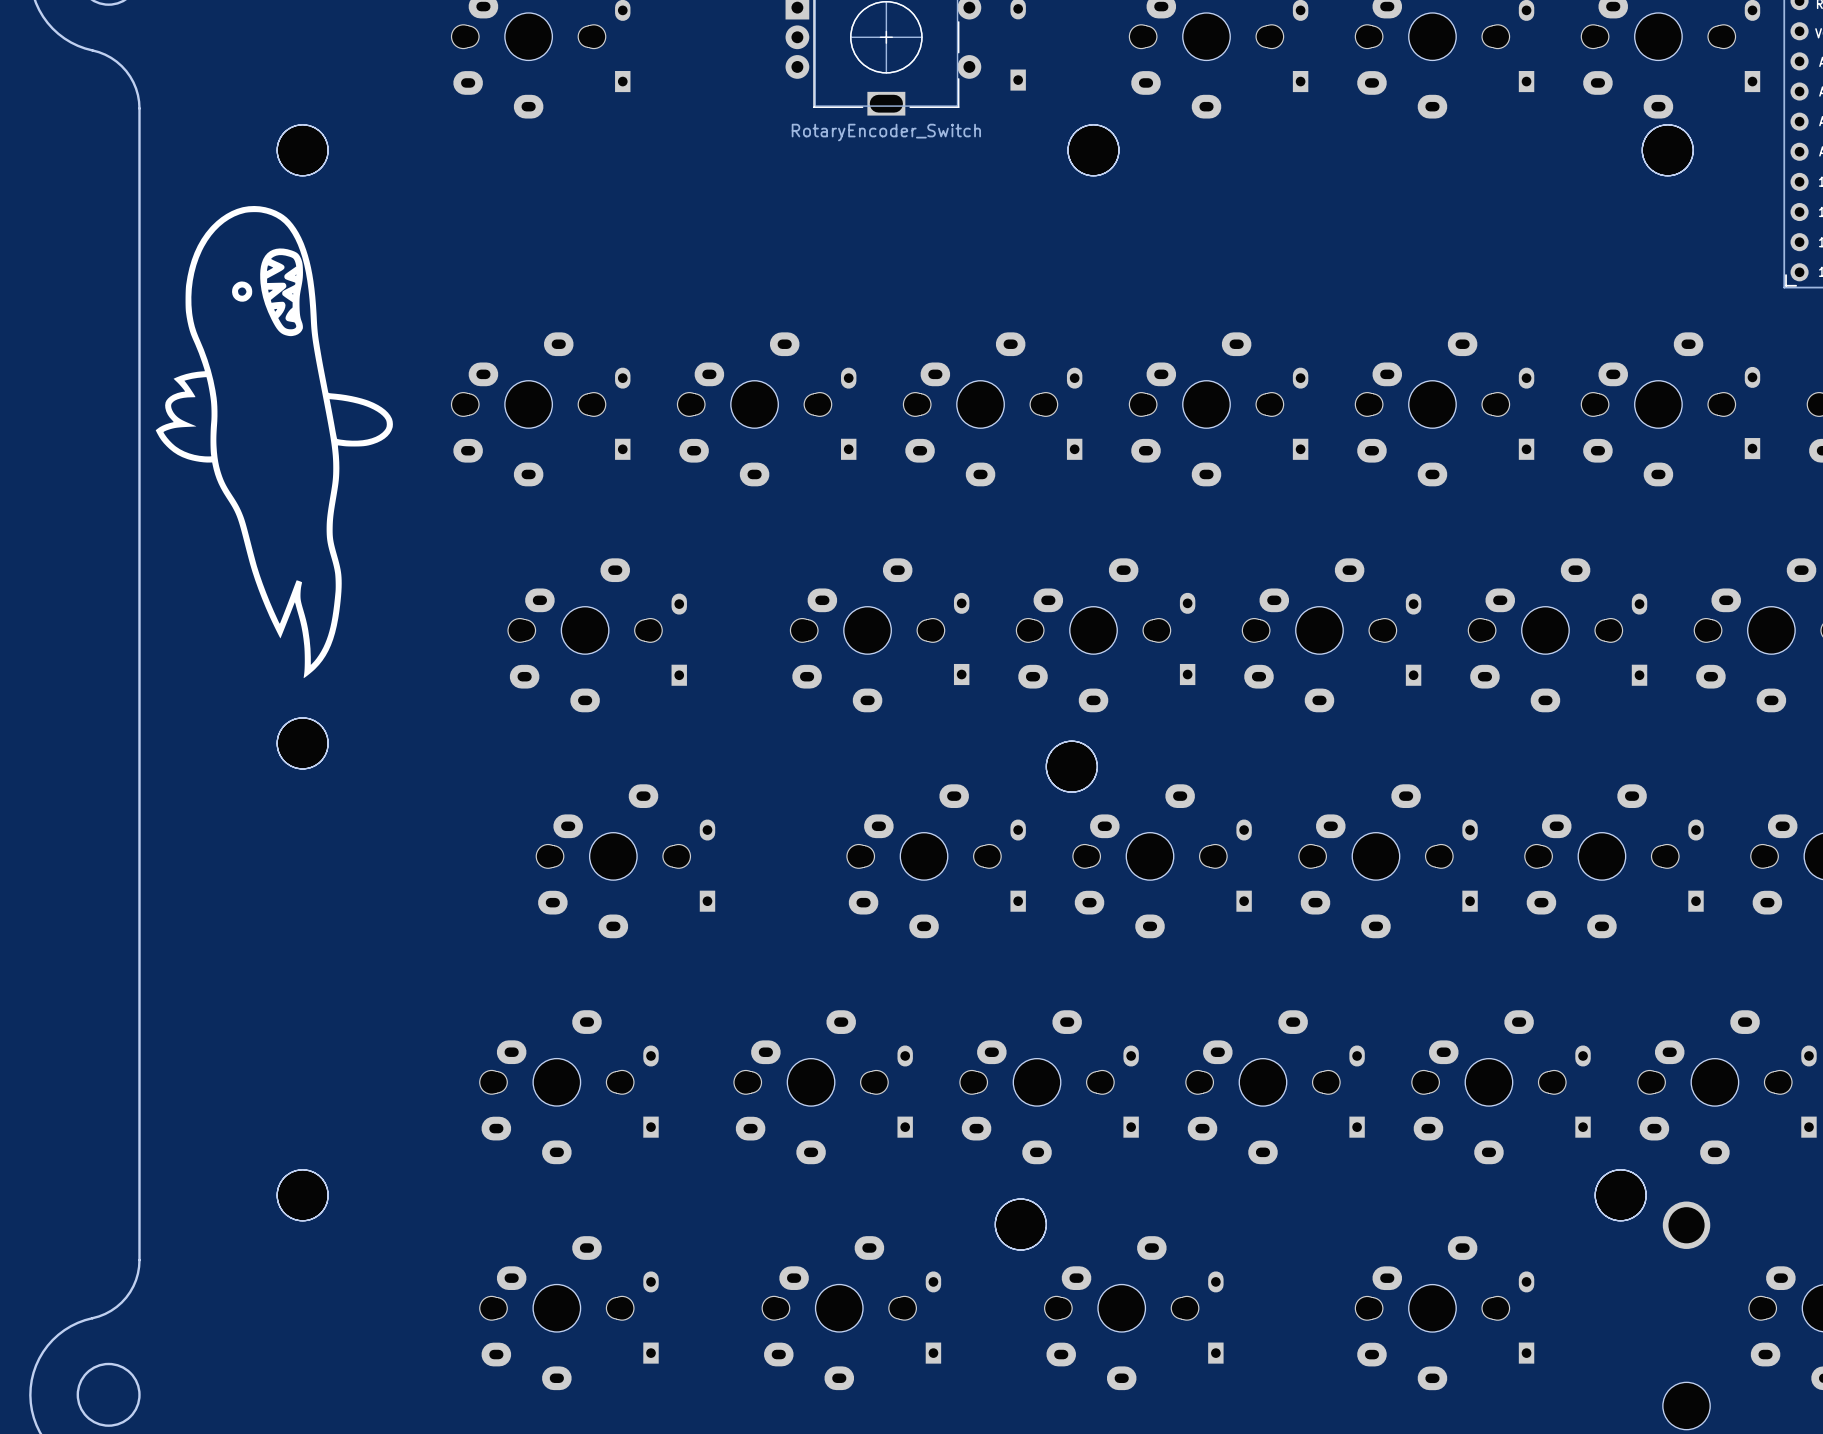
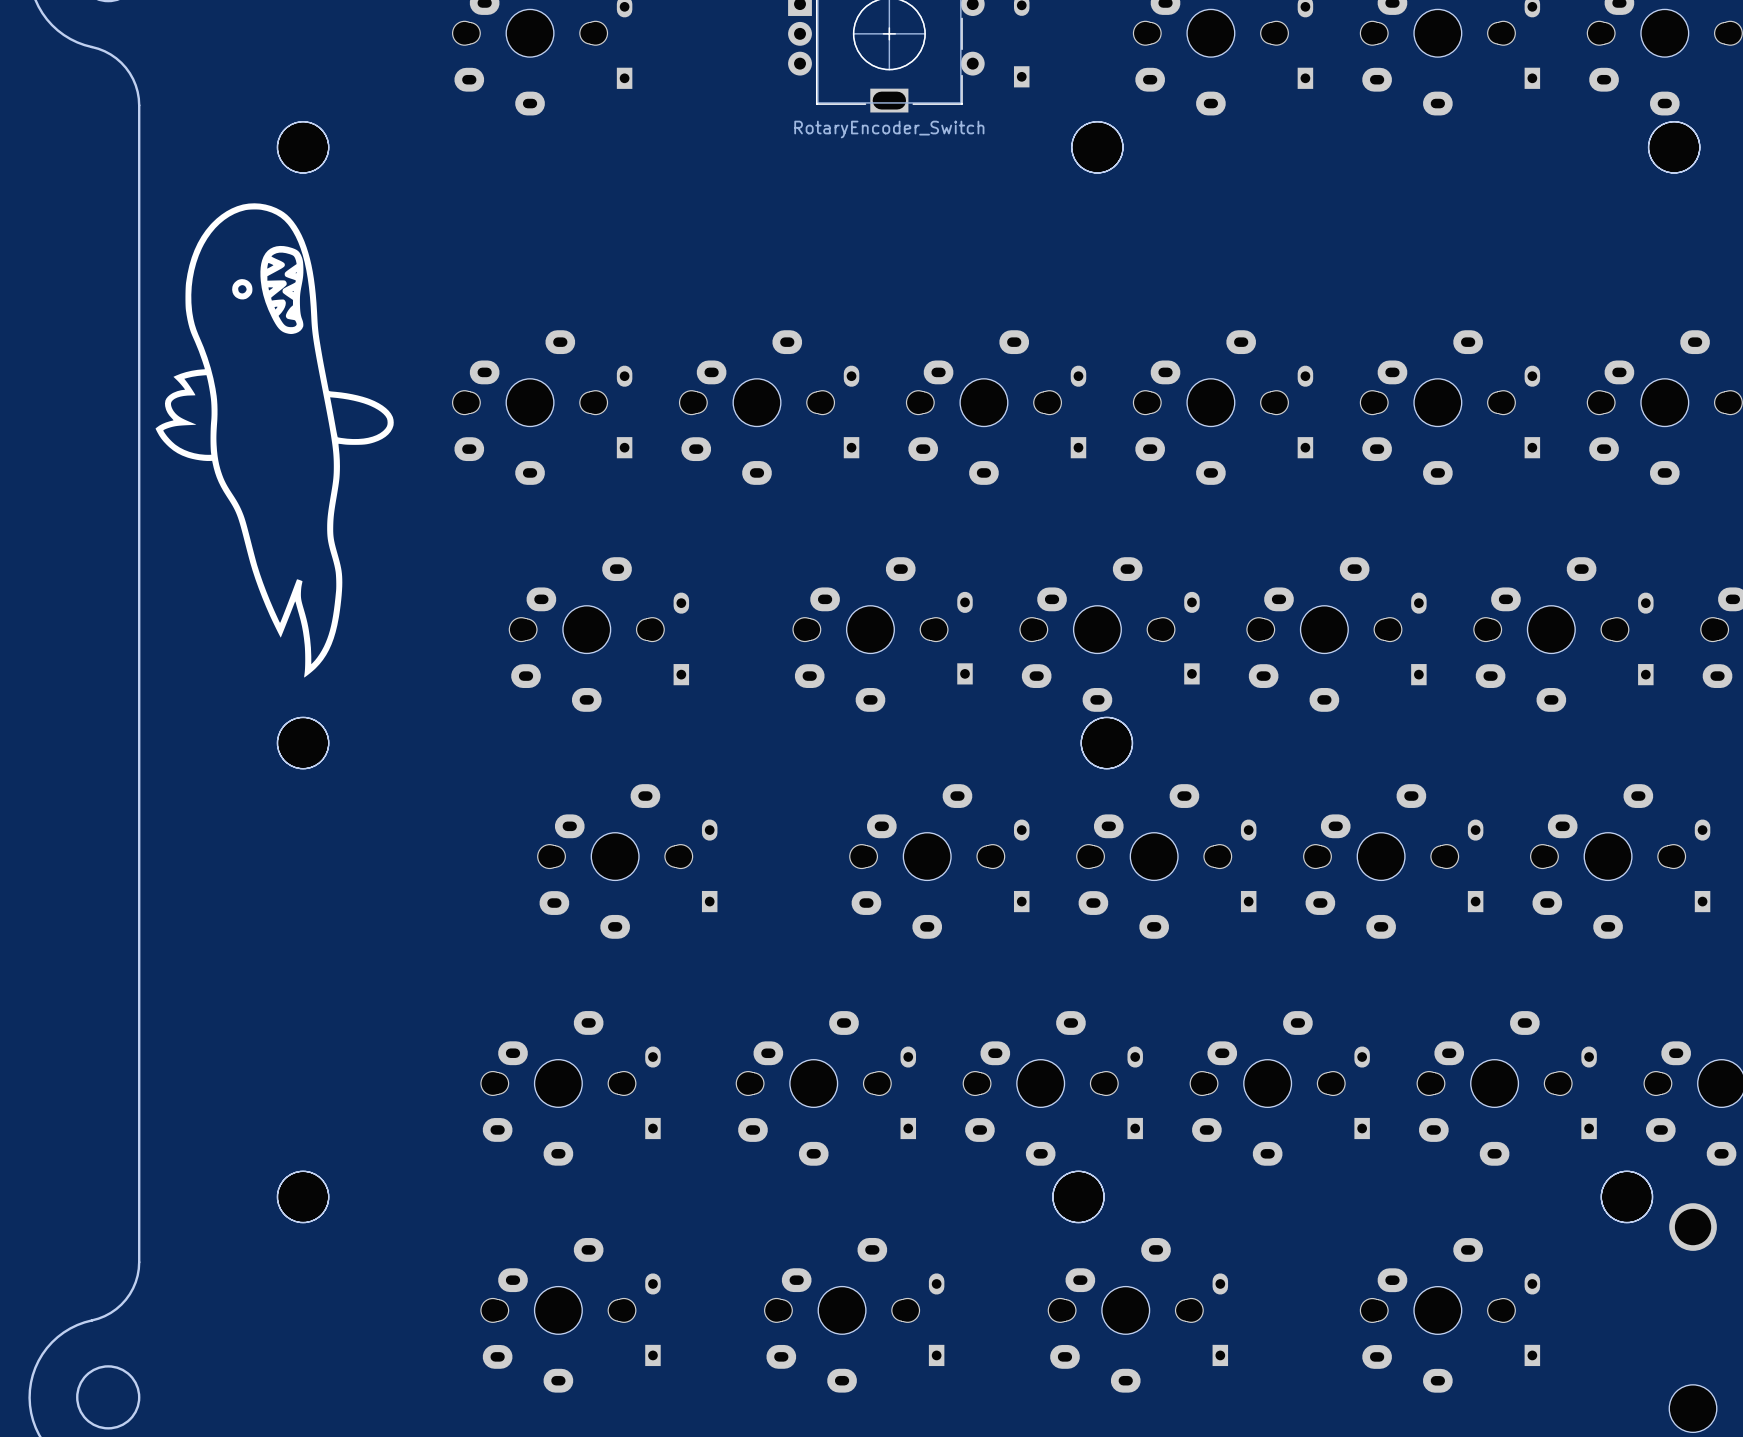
part position: (1071, 766) -> (1106, 743)
part position: (1020, 1224) -> (1078, 1196)

